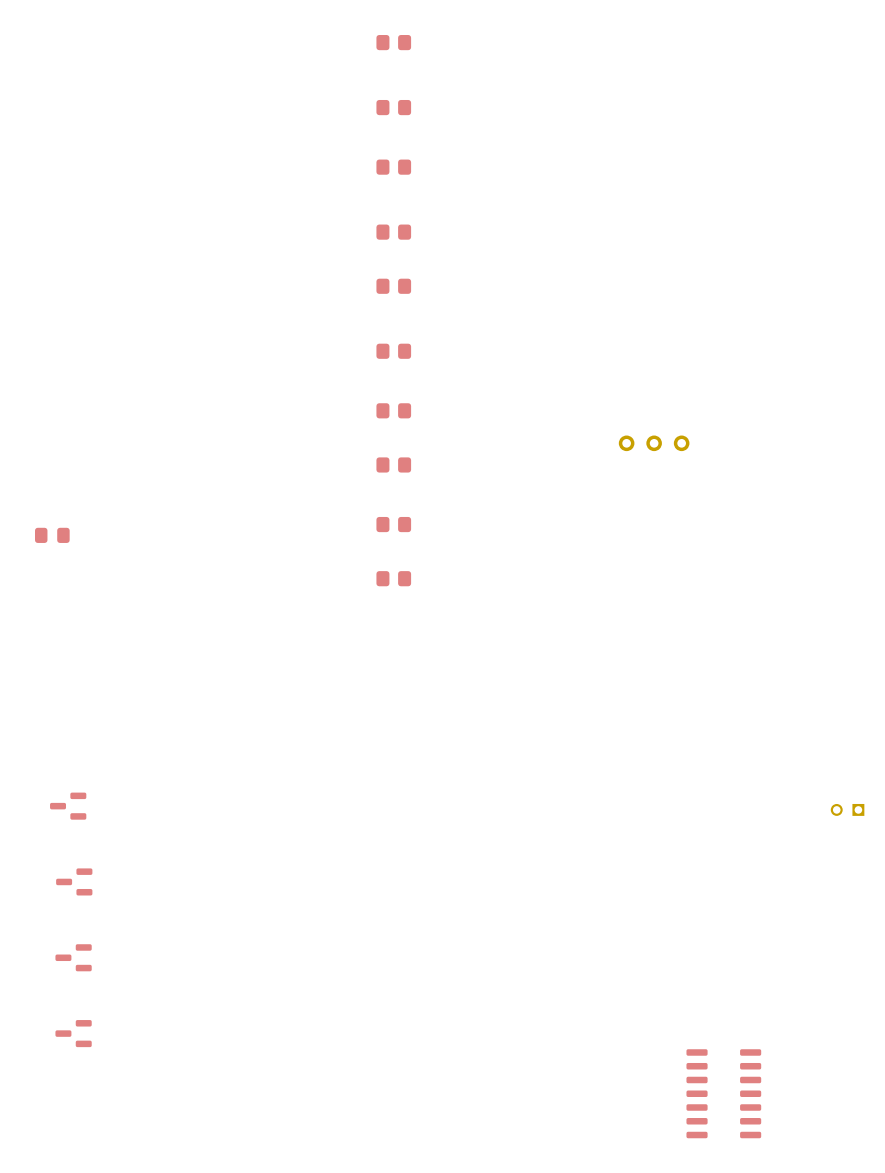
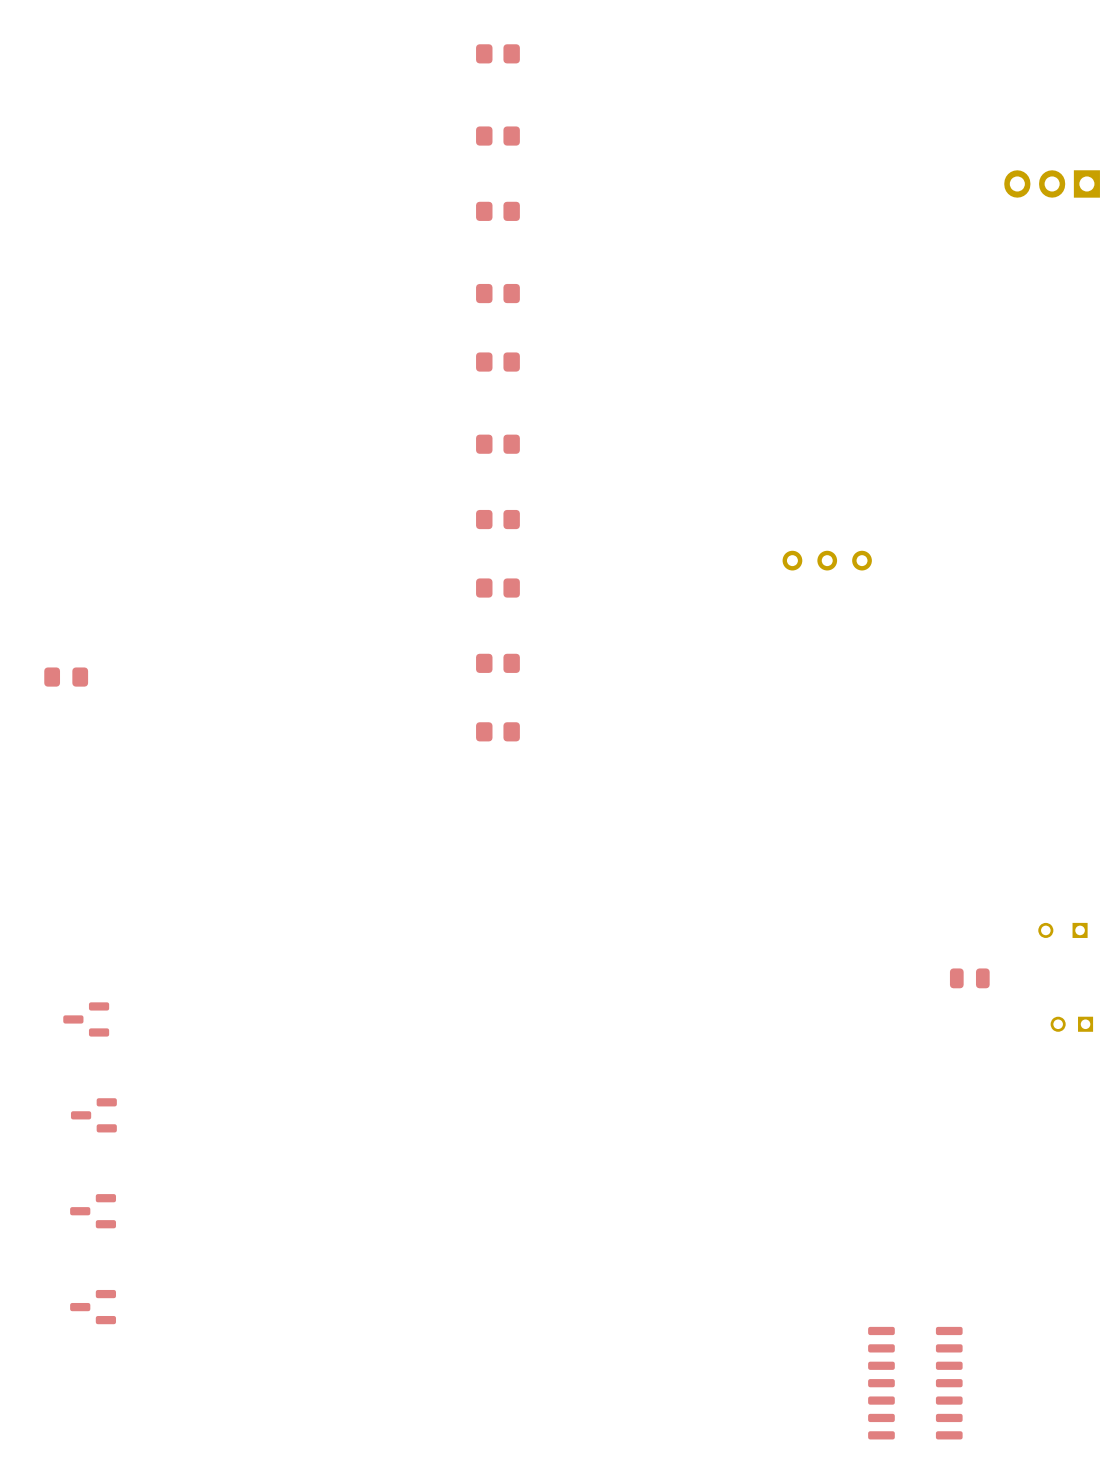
part: none -> (1052, 183)
part: none -> (1062, 930)
part: none -> (969, 978)

